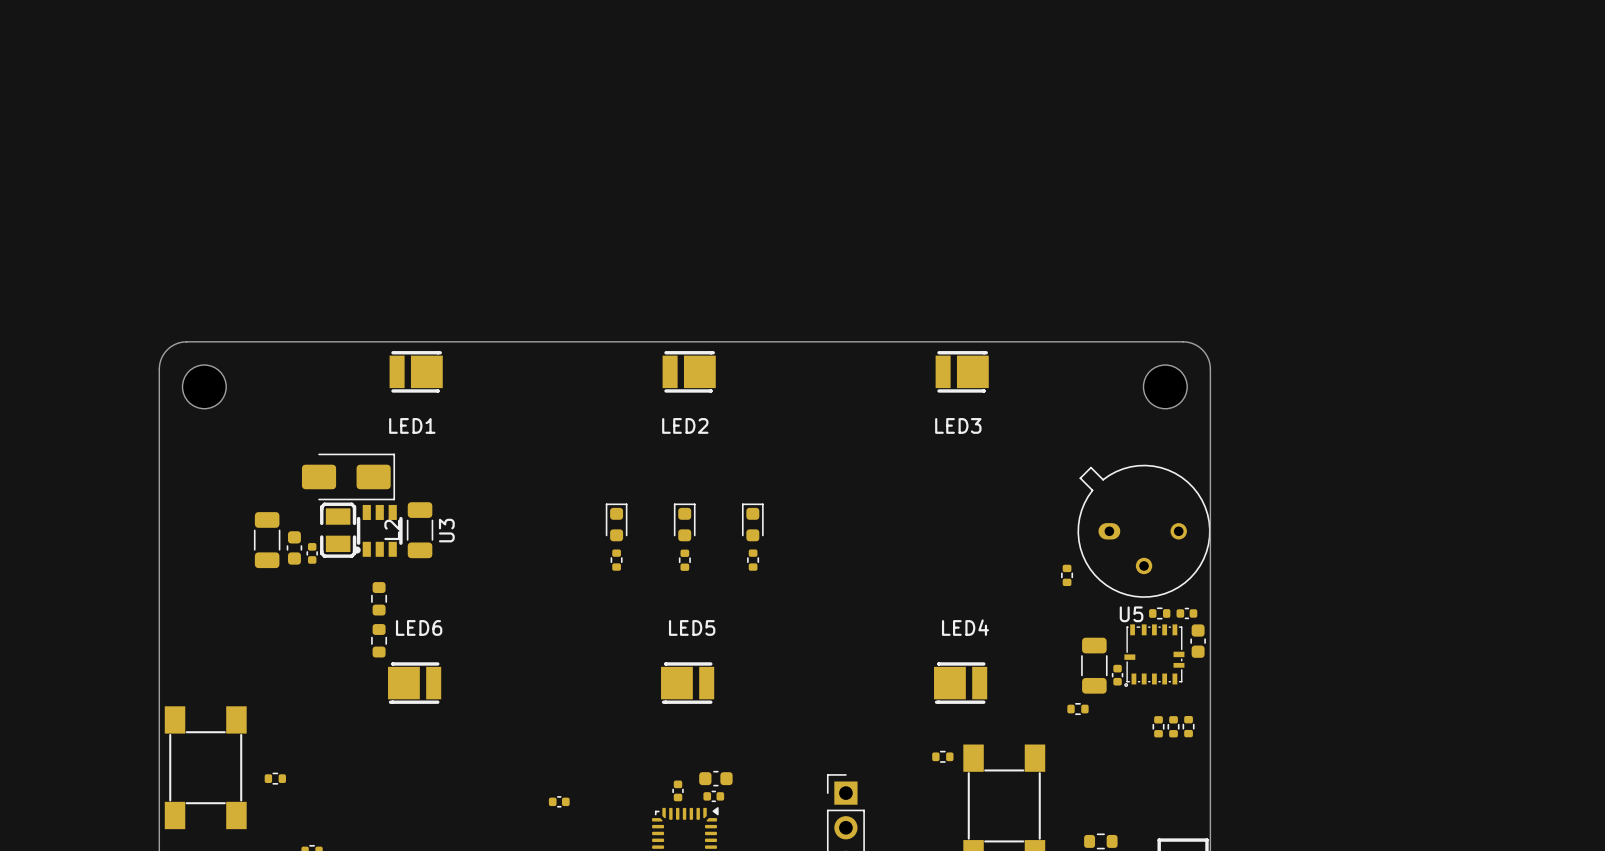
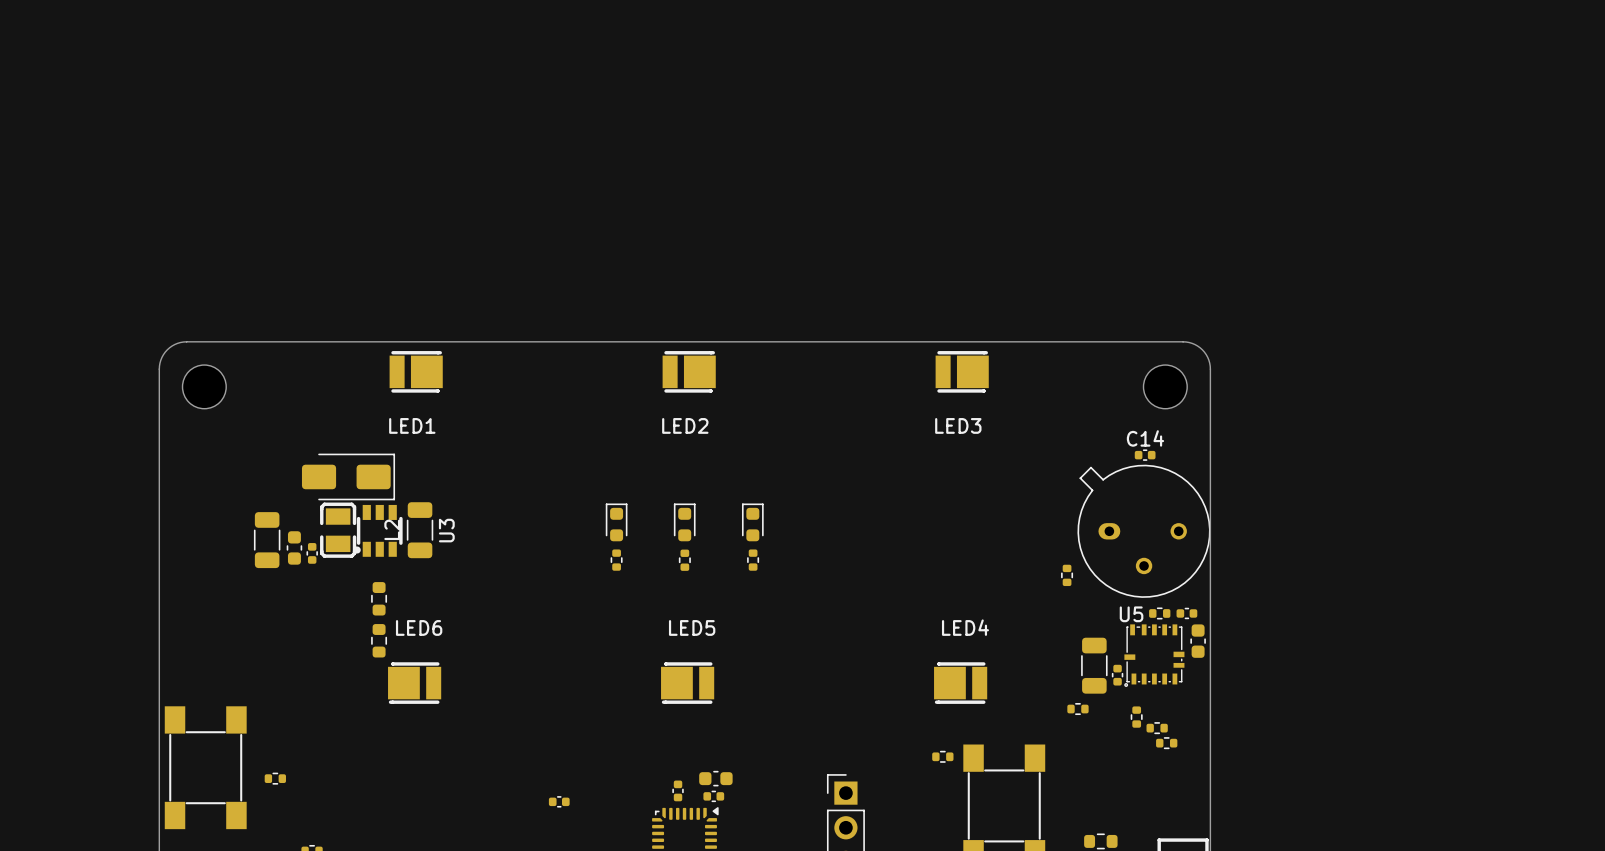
C14: none -> (1145, 455)
part: none -> (1136, 717)
part rotation: 0° (1158, 726) -> 90° clockwise (1157, 728)
part: (1173, 726) -> none
part: (1188, 726) -> none
part: none -> (1166, 743)

